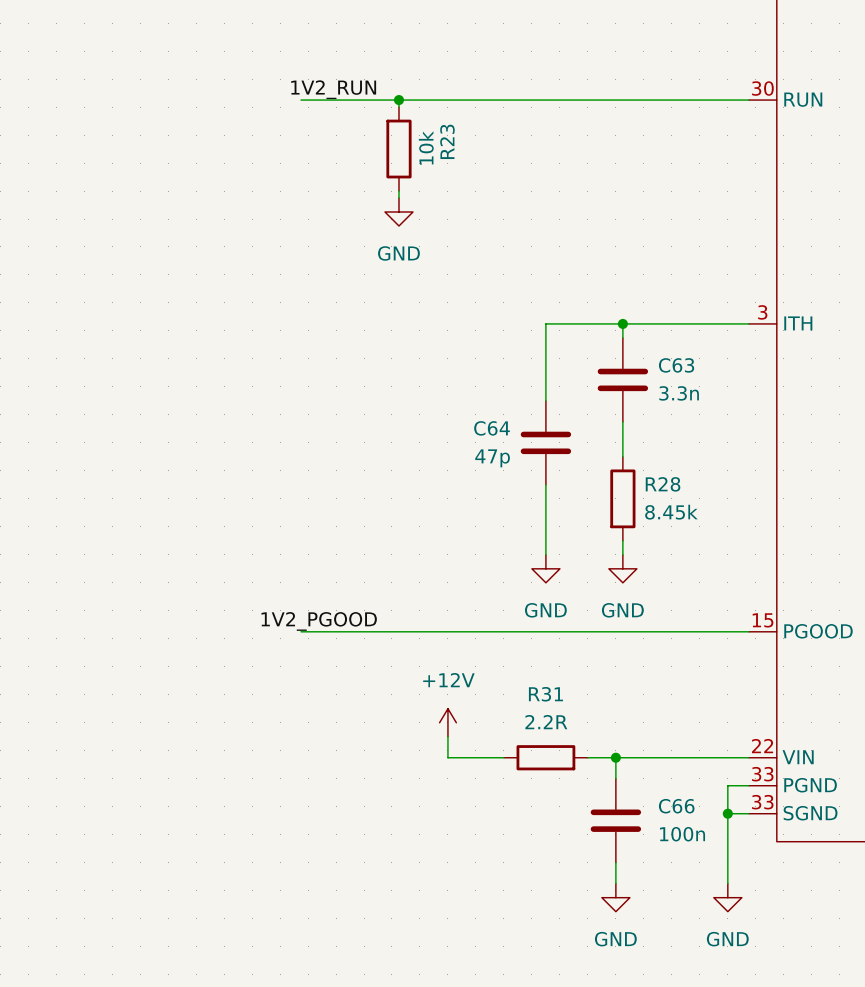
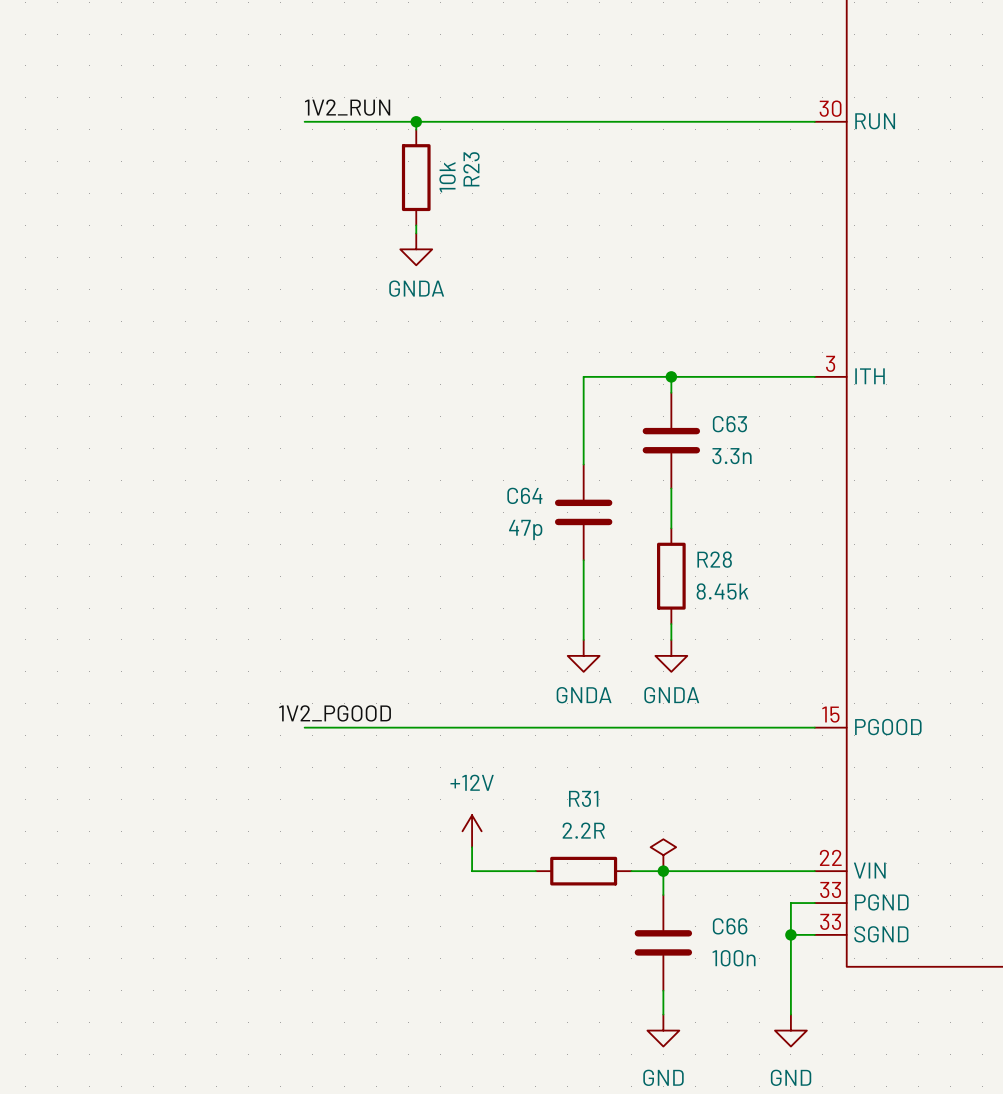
power symbol: GND (398, 212) -> GNDA (416, 249)
power symbol: GND (545, 568) -> GNDA (583, 655)
power symbol: GND (622, 568) -> GNDA (671, 655)
power symbol: none -> (663, 855)

